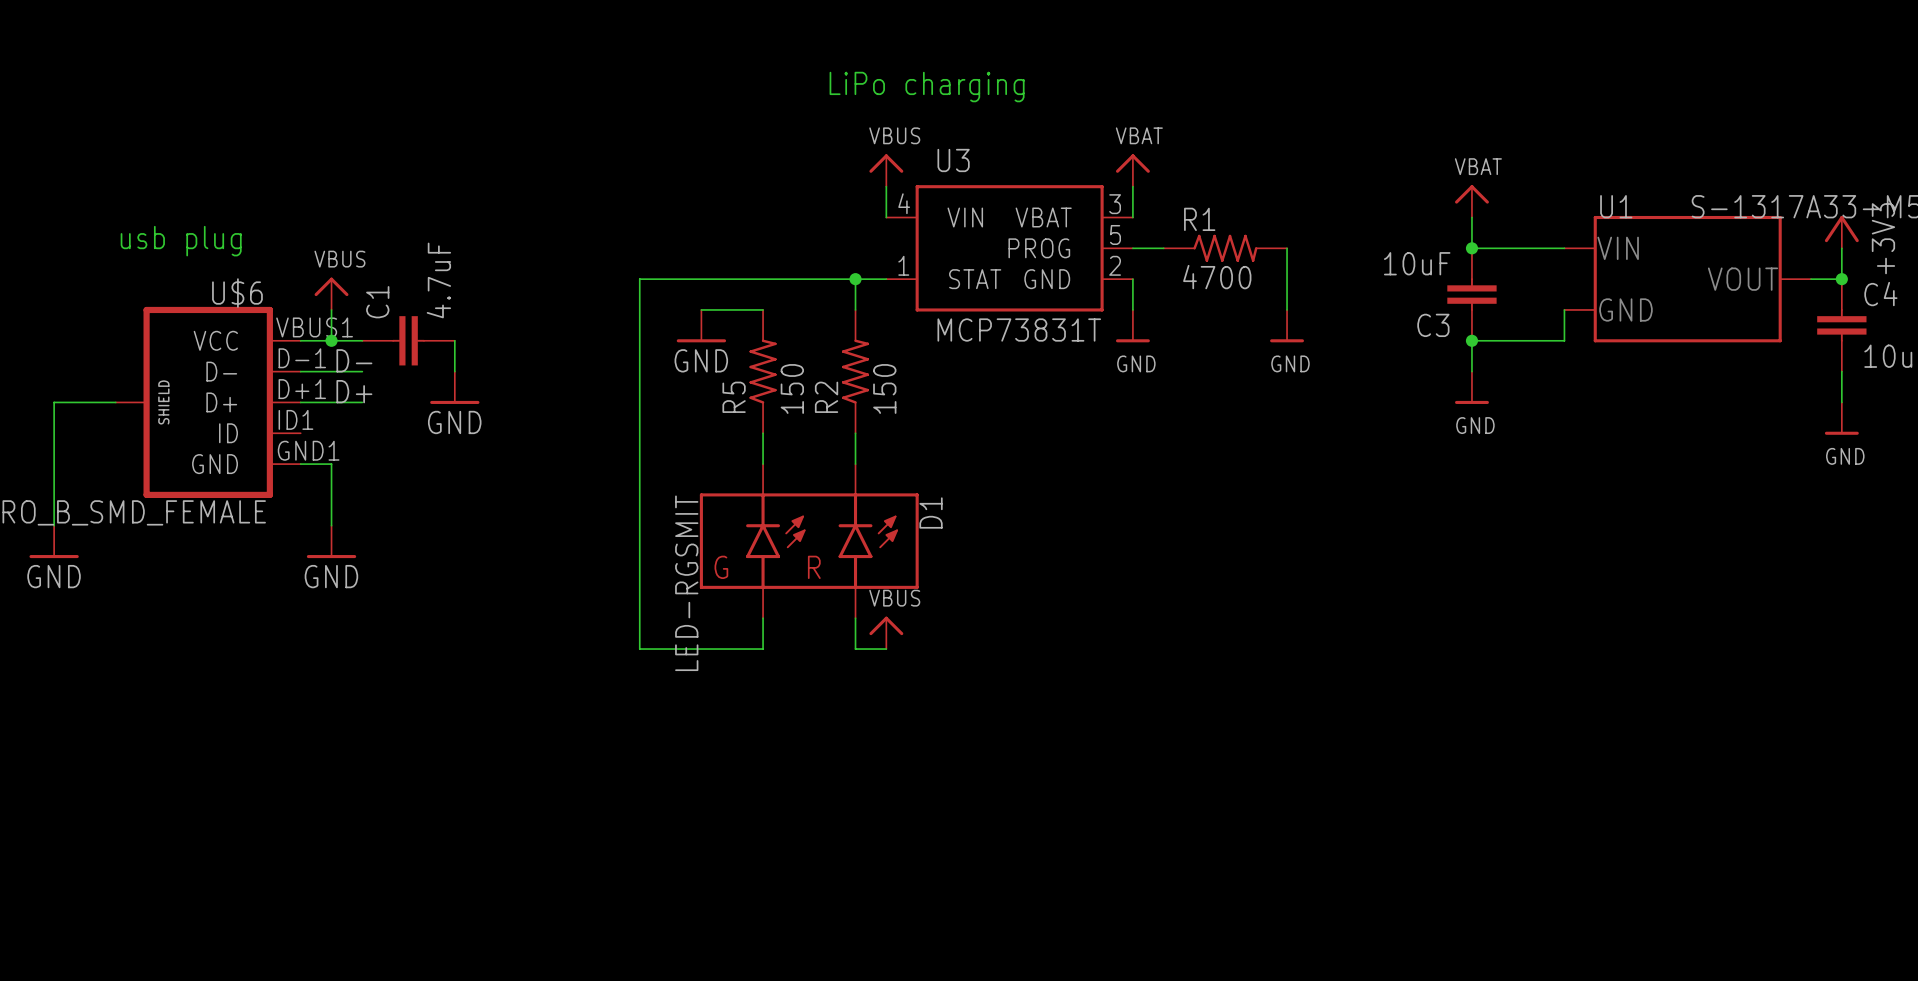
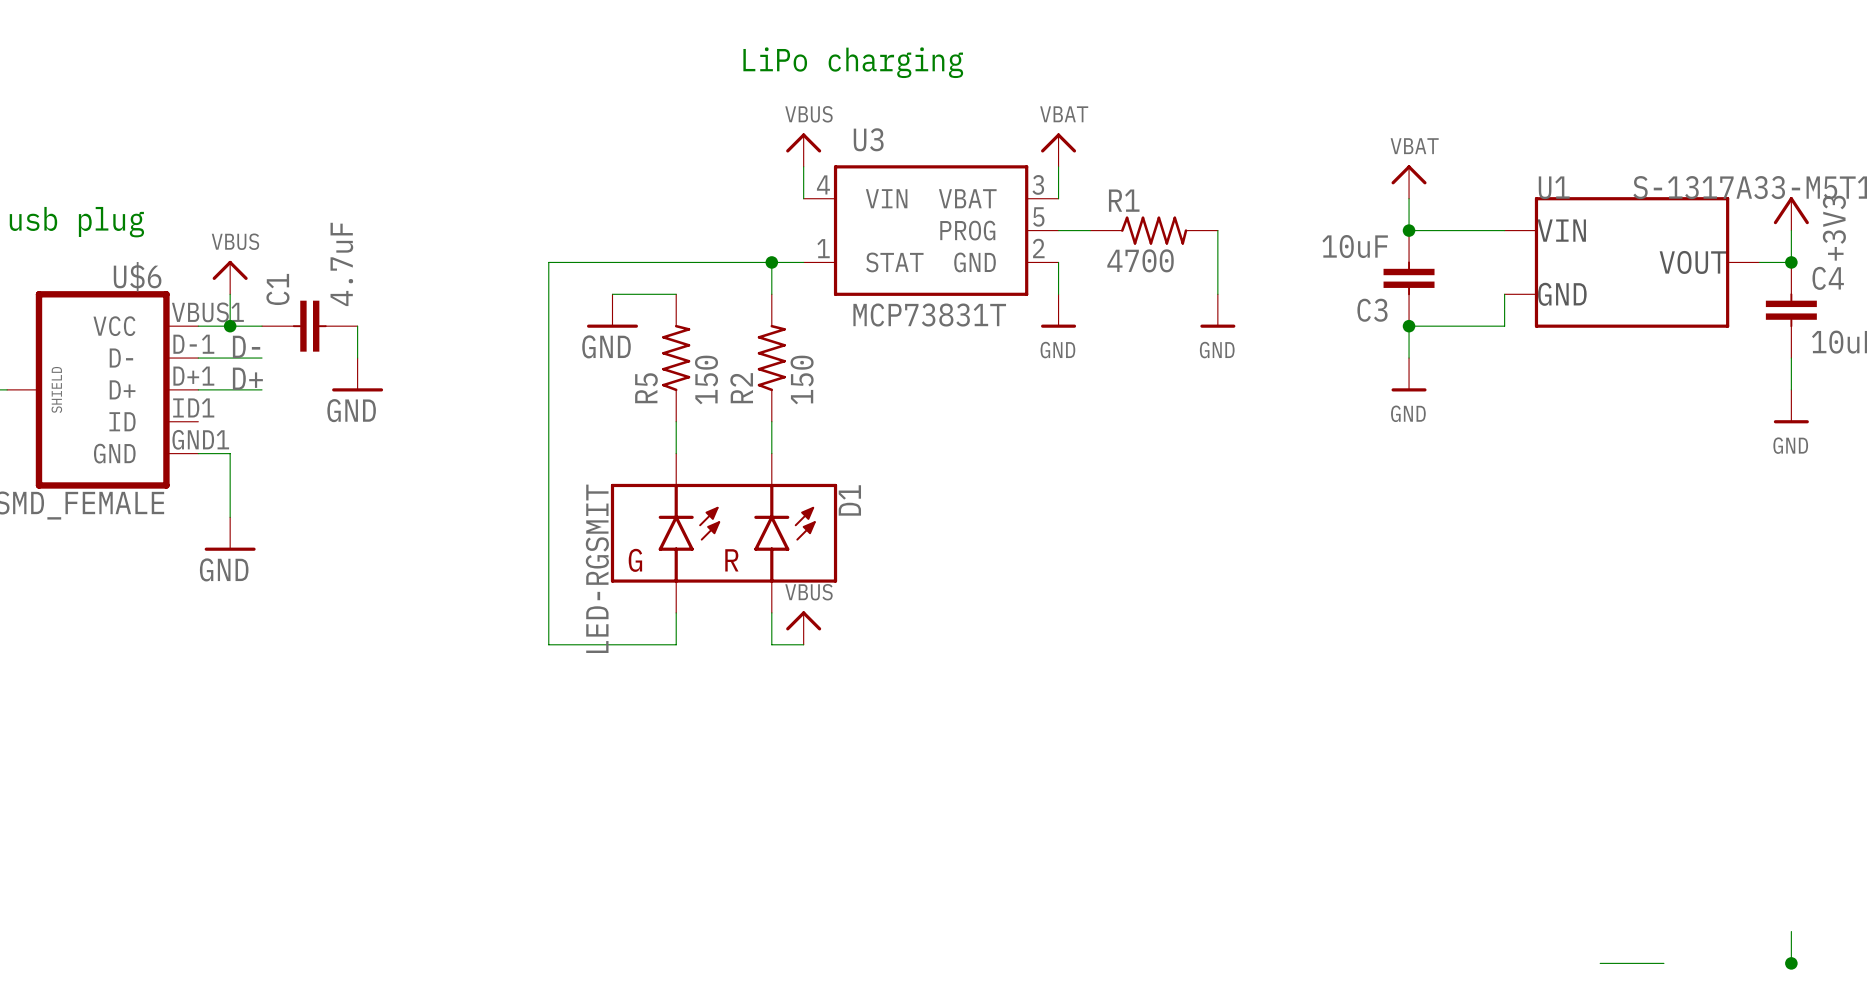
wire: none -> (1791, 931) (1791, 963)
wire: none -> (1600, 963) (1663, 963)
junction: none -> (1791, 963)

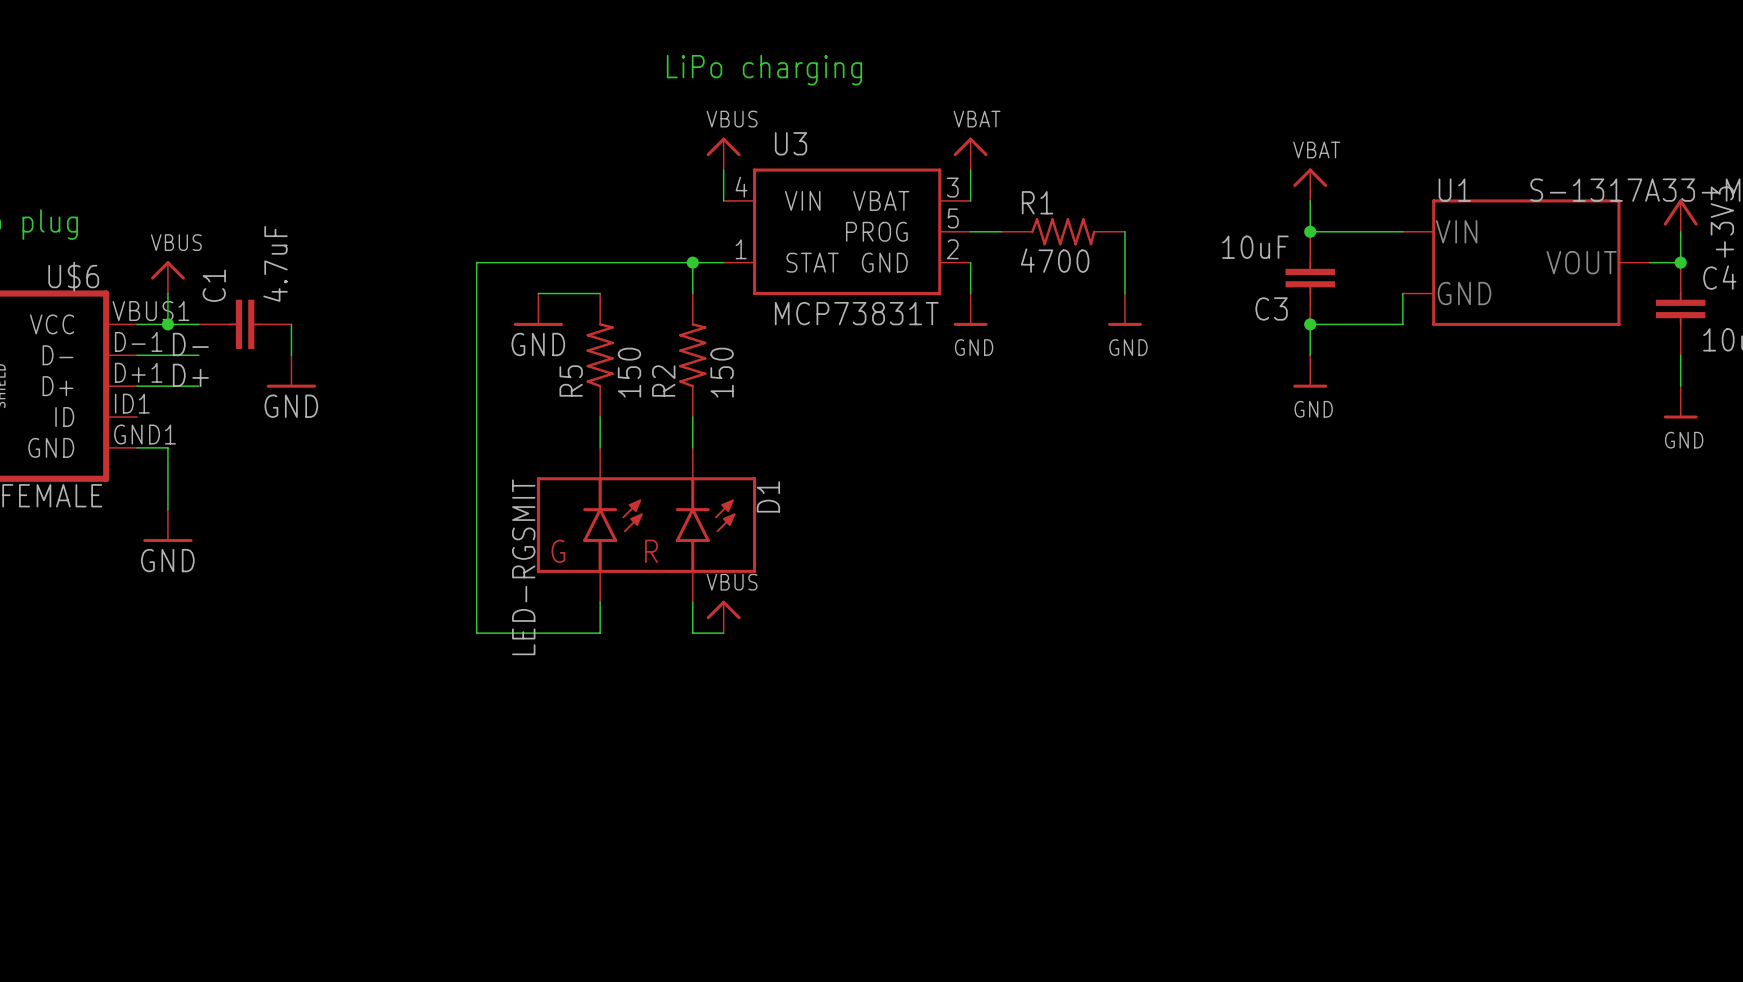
wire: (1791, 931) (1791, 963) -> none
wire: (1600, 963) (1663, 963) -> none
junction: (1791, 963) -> none

